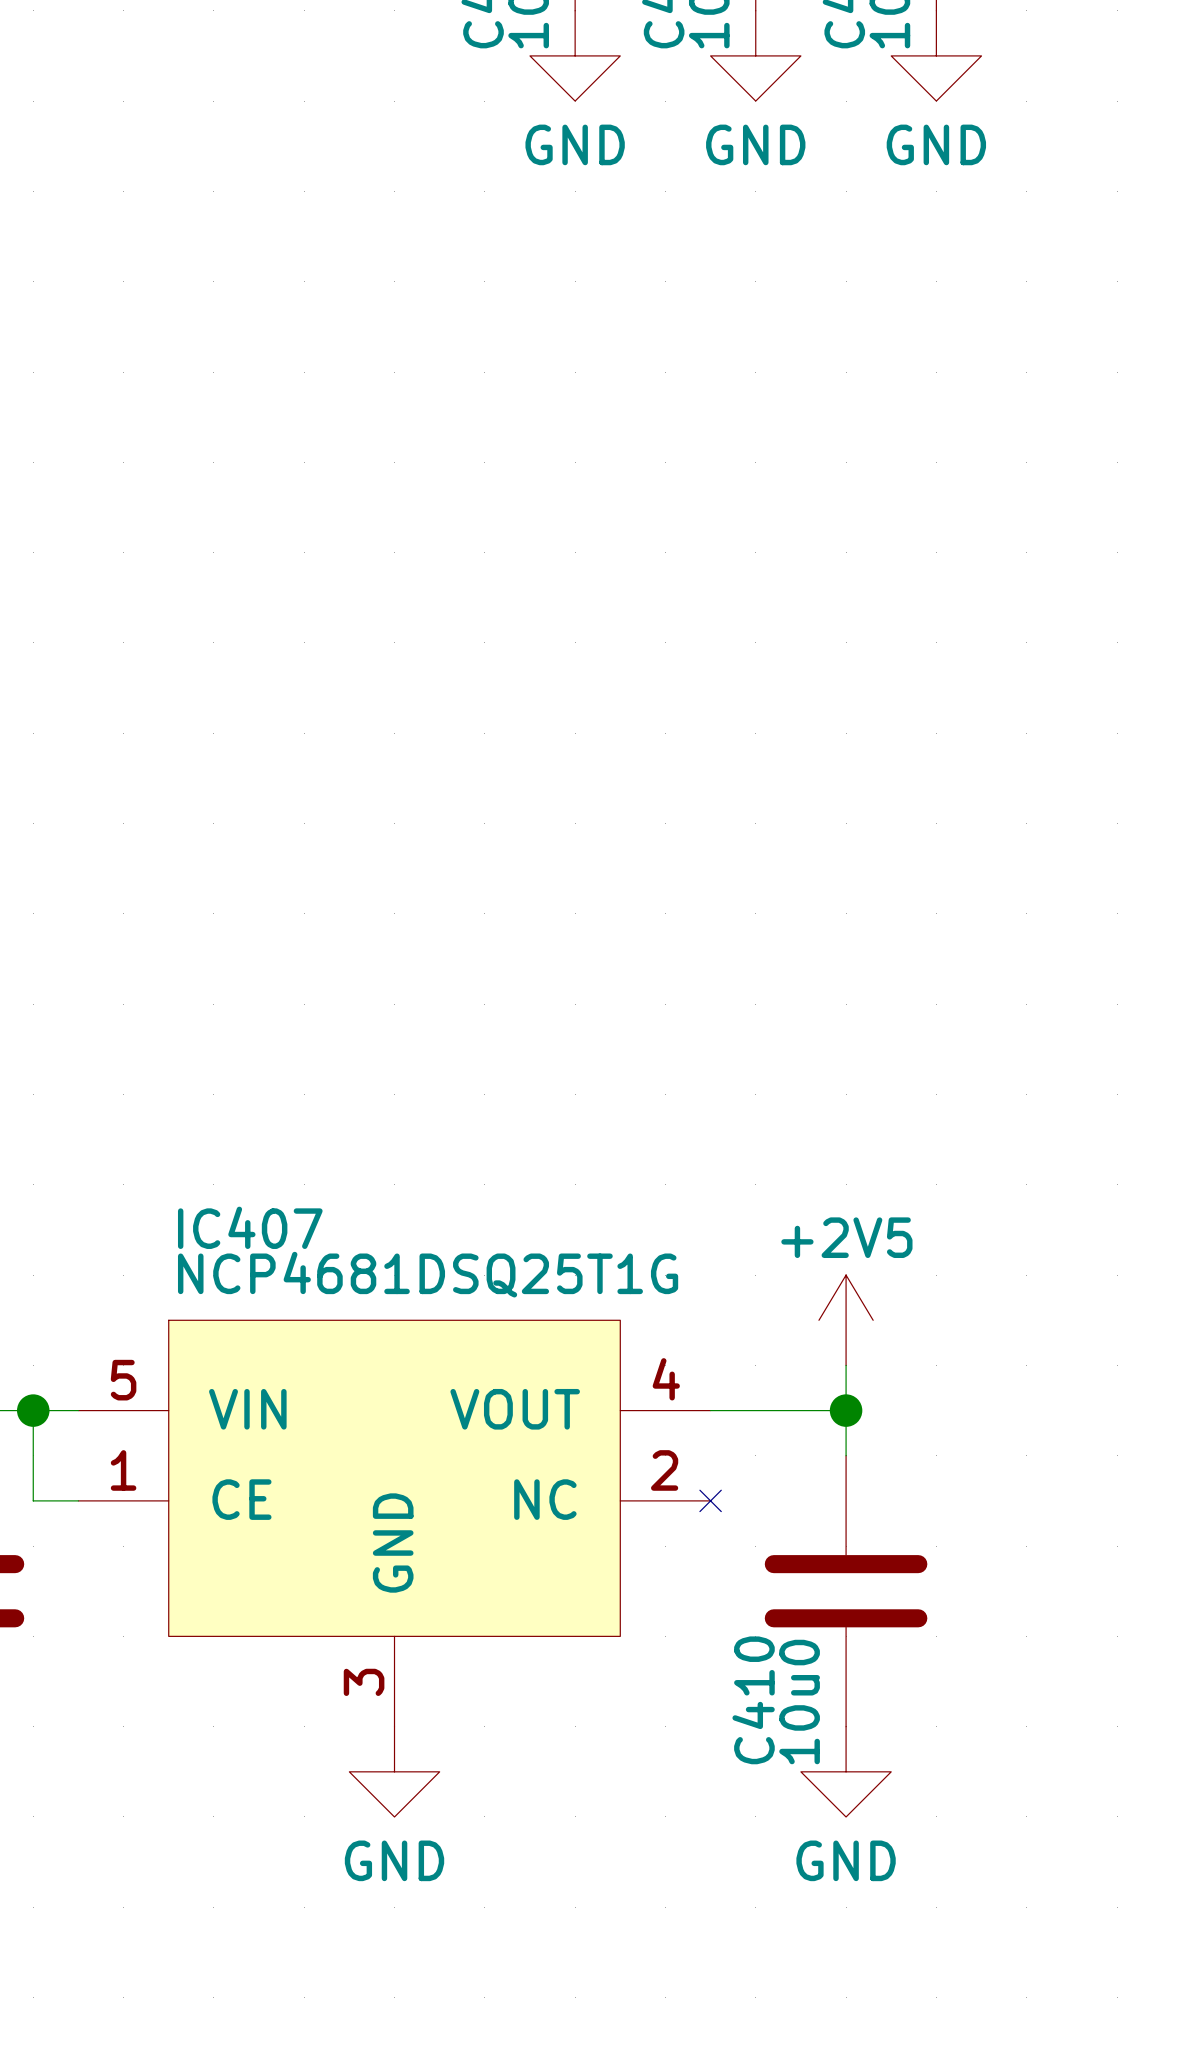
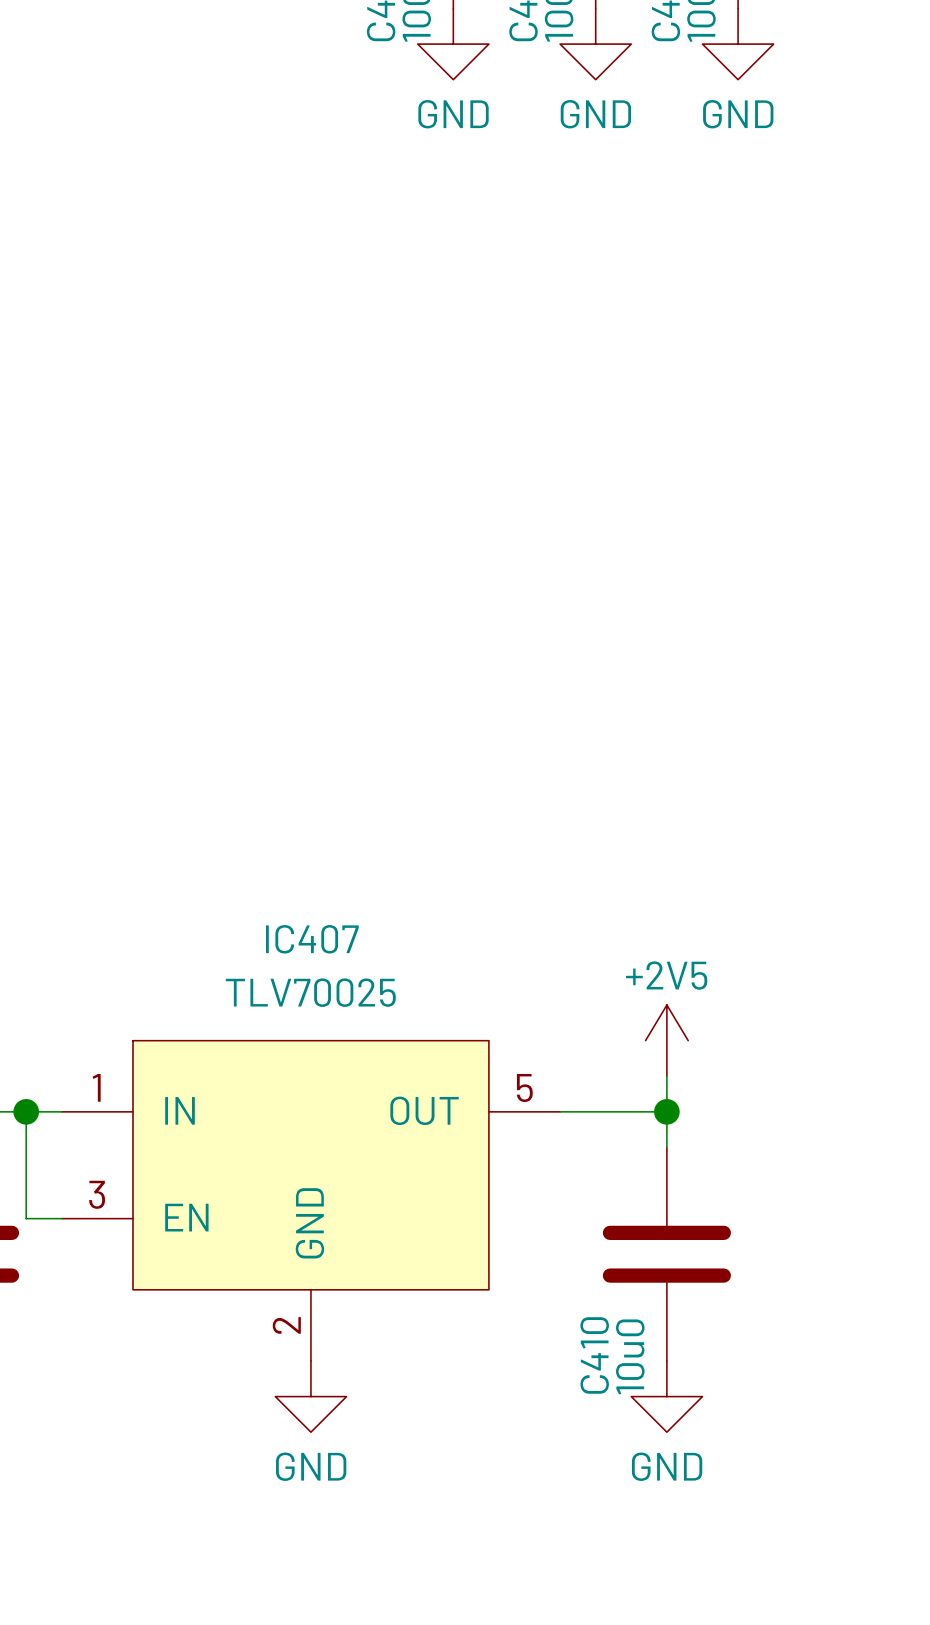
IC407 name position: IC407 (250, 1227) -> IC407 (312, 939)
IC407 value: none -> TLV70025 (310, 992)
IC407 text: NCP4681DSQ25T1G (428, 1274) -> none
IC407 symbol: [78, 1320, 722, 1727] -> [61, 1040, 561, 1362]
wire: (33, 1500) (78, 1500) -> (26, 1183) (26, 1218) (61, 1218)

